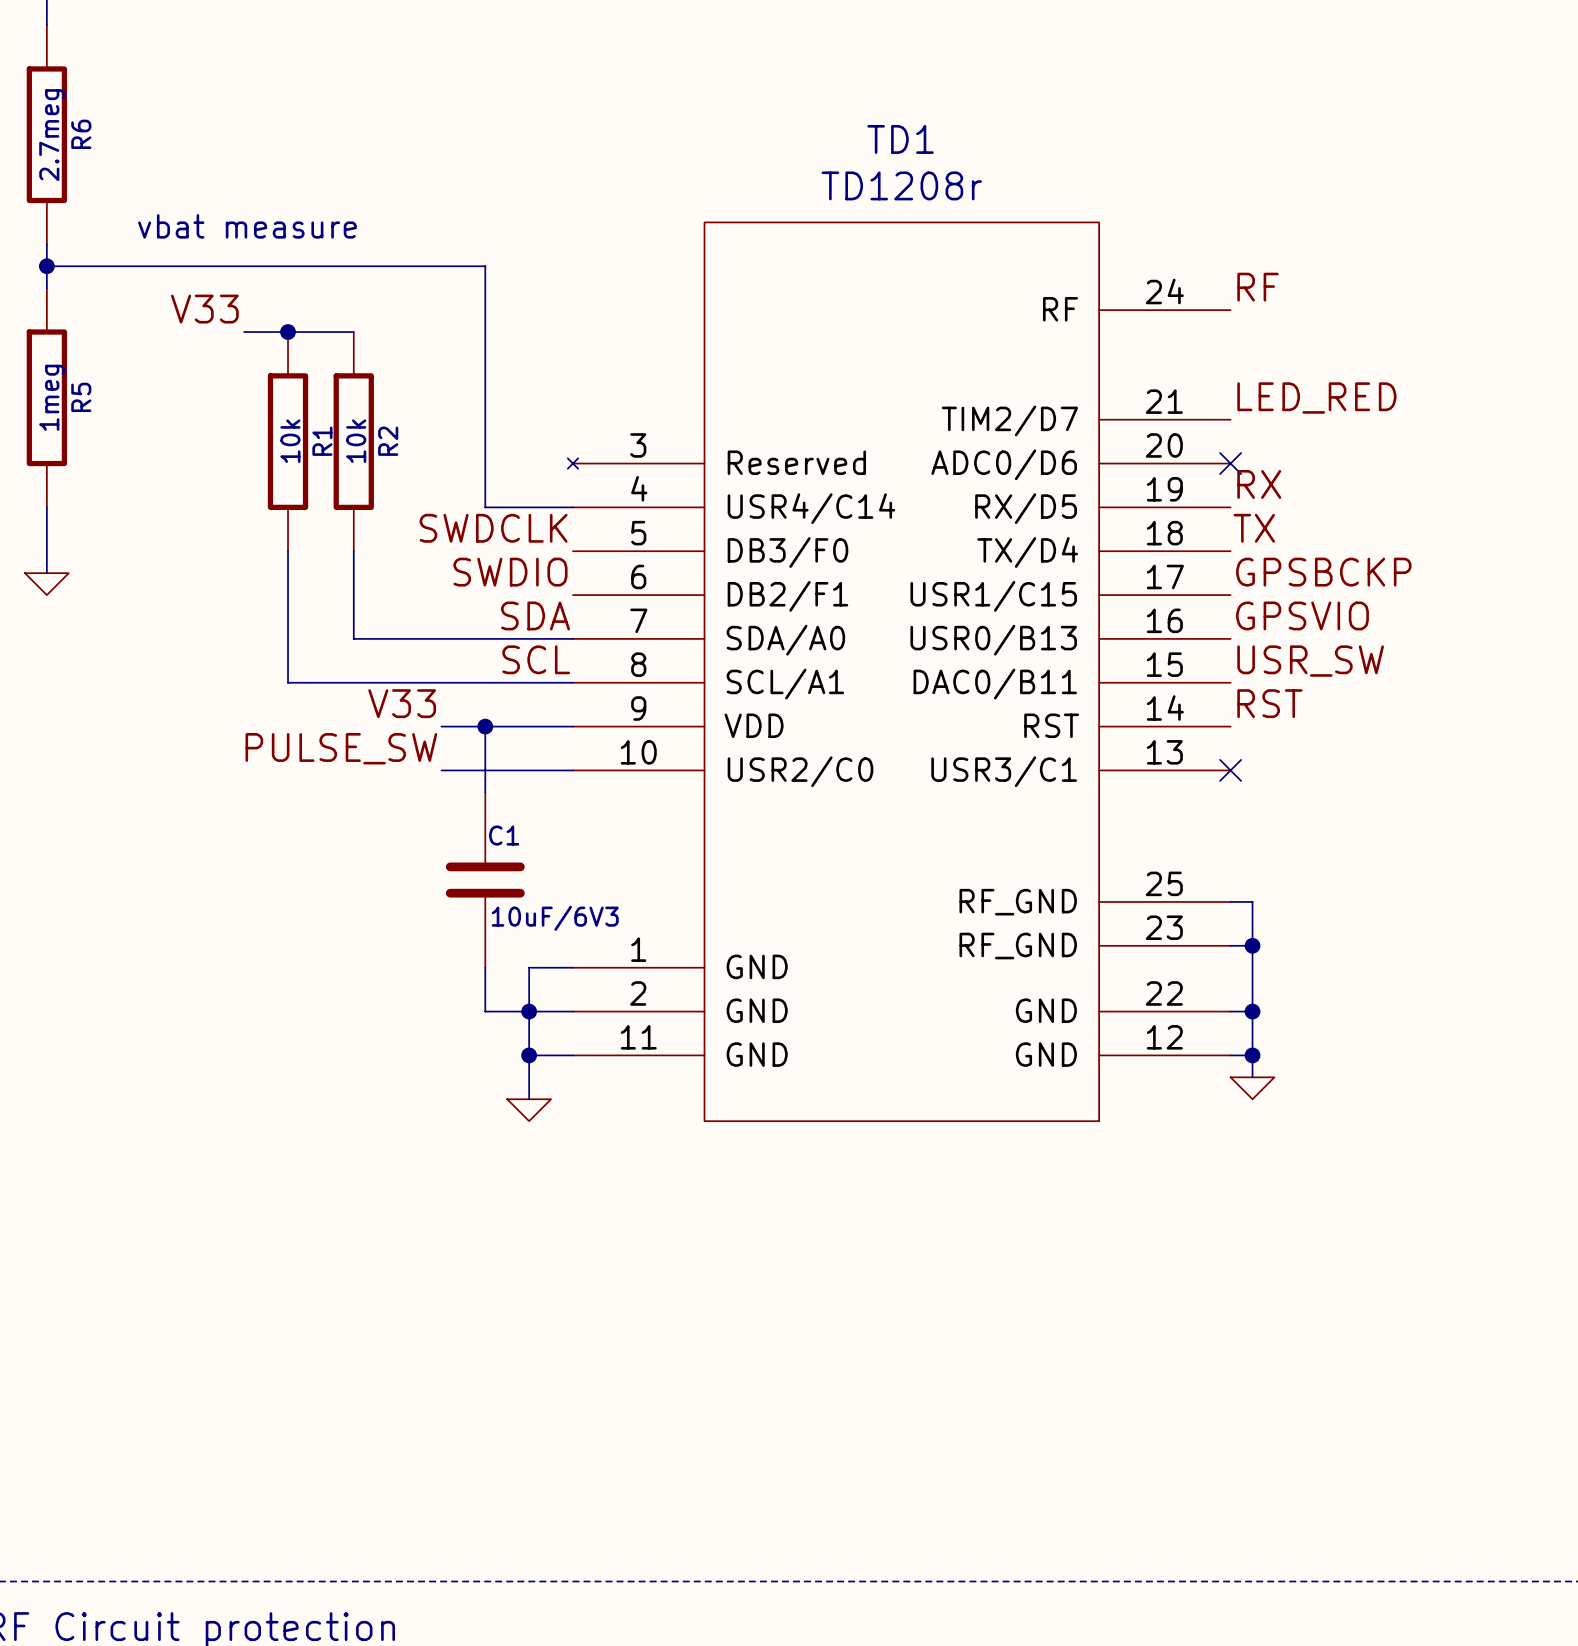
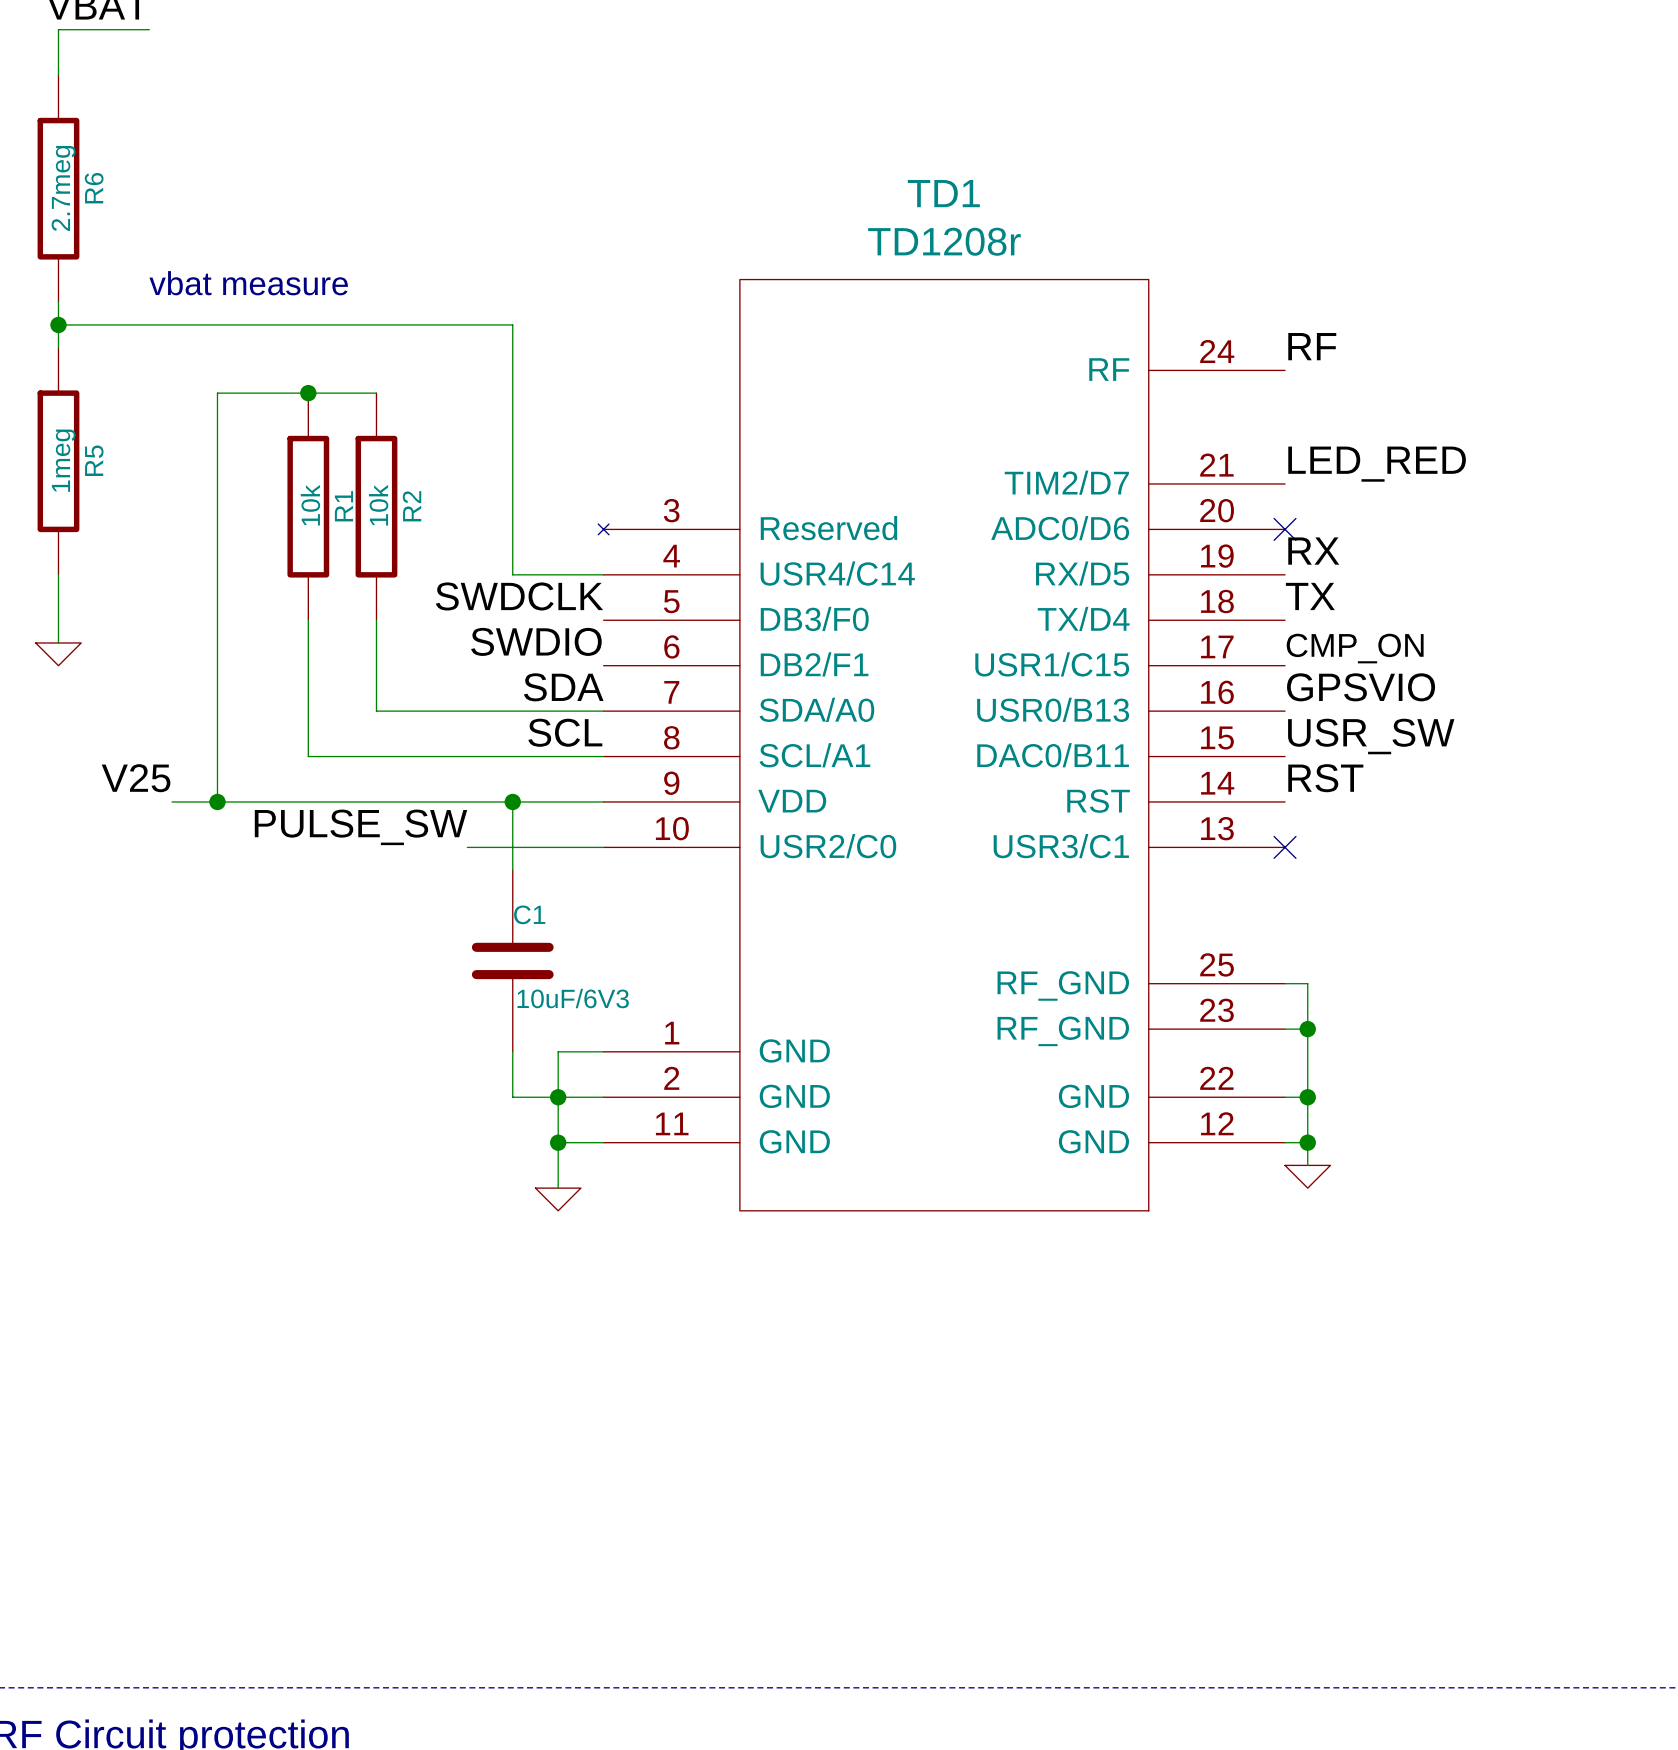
label: V33 (204, 309) -> none
wire: none -> (262, 393) (217, 393) (217, 801)
label: GPSBCKP (1323, 572) -> CMP_ON (1355, 648)
label: none -> V25 (136, 778)
label: V33 (402, 703) -> none
wire: none -> (172, 801) (467, 801)
junction: none -> (217, 801)

